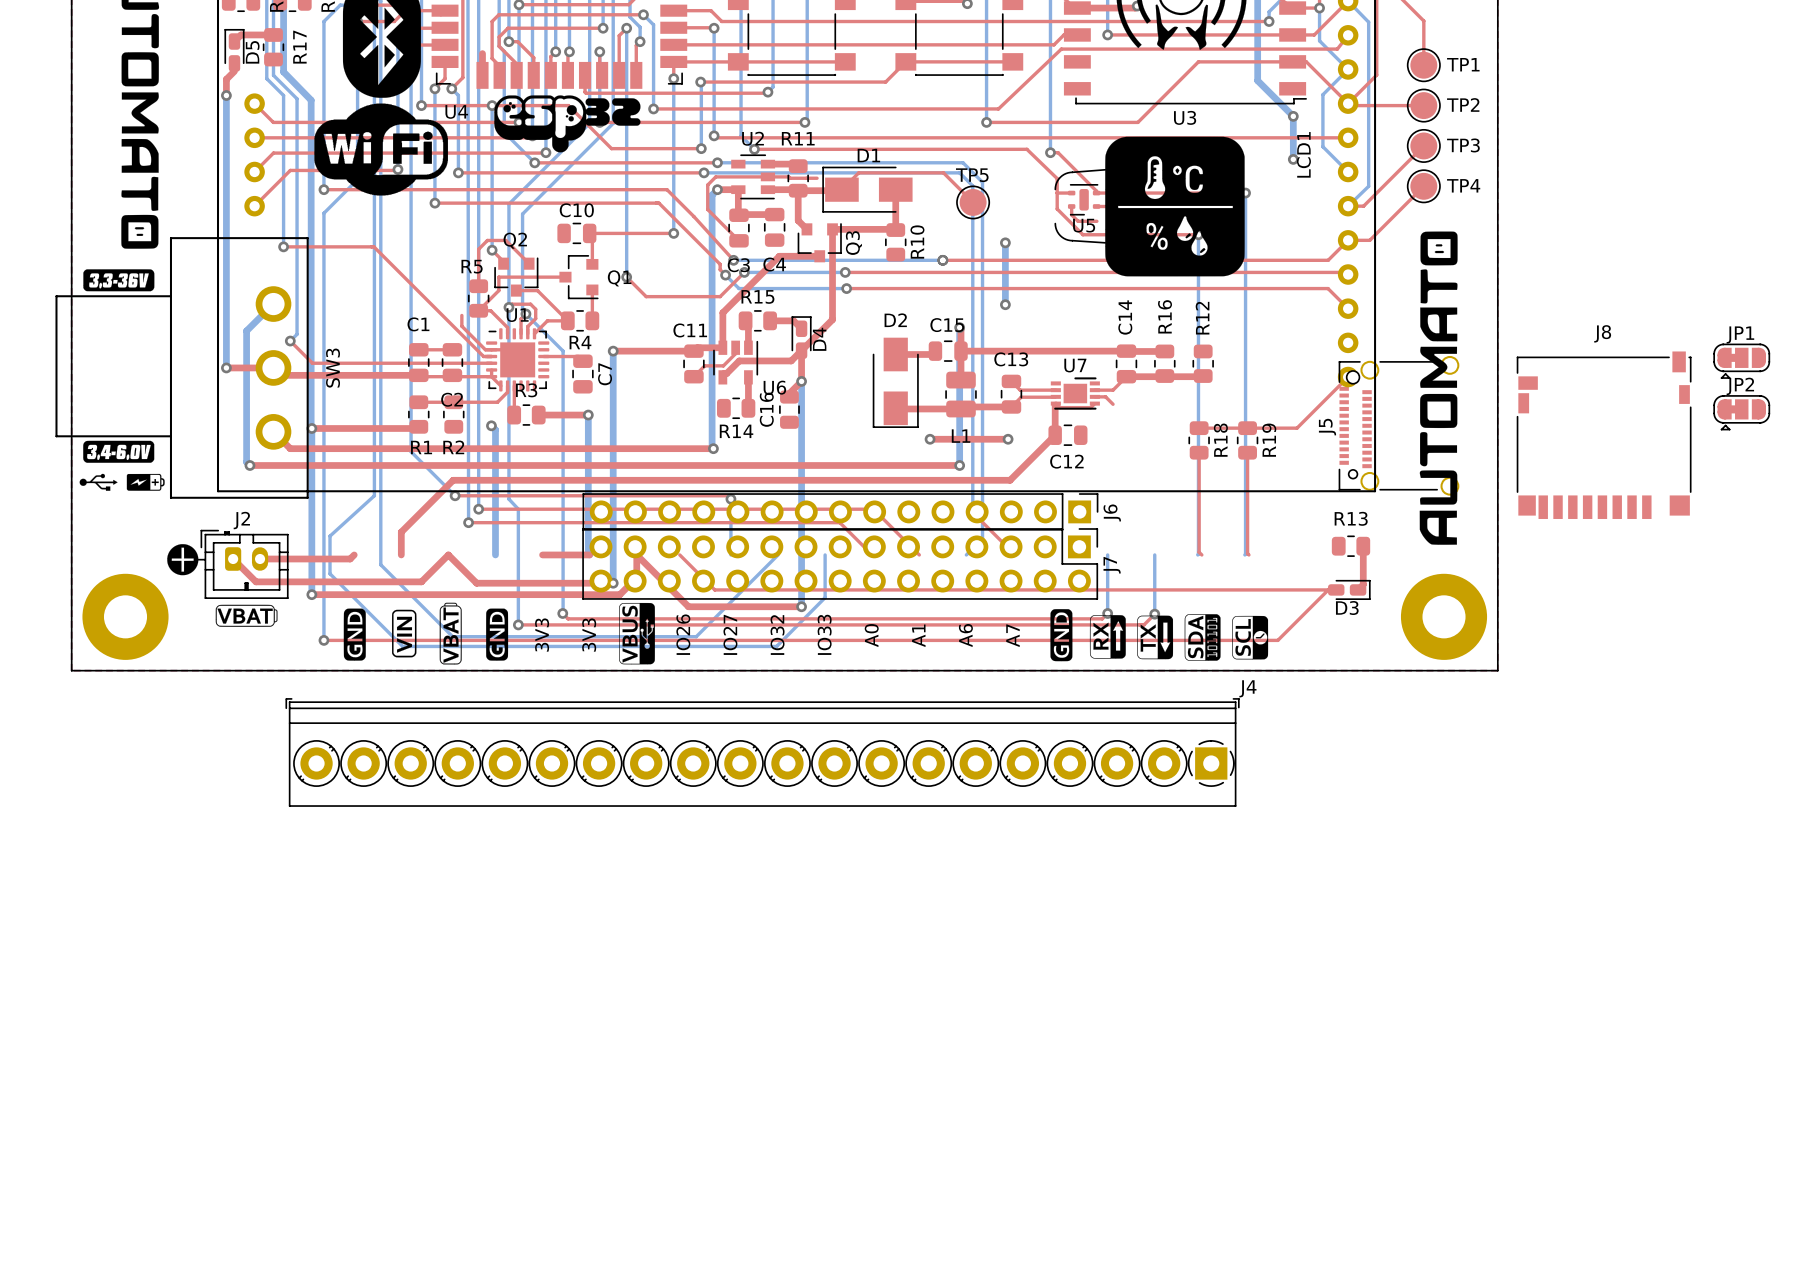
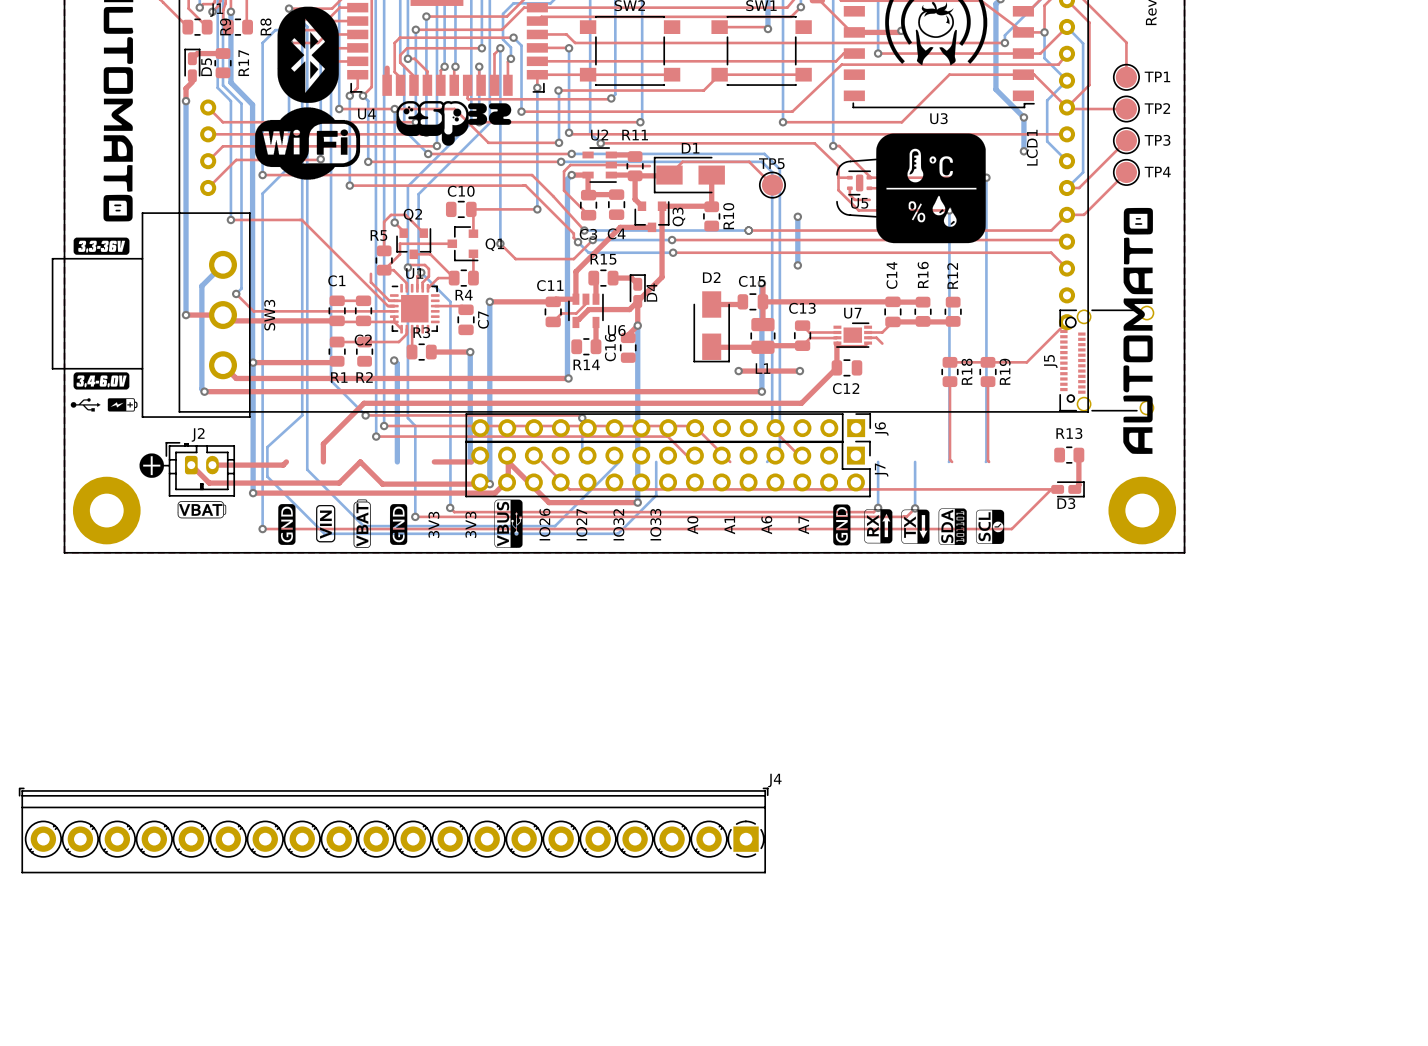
JP1: (1741, 361) -> none
JP2: (1741, 412) -> none
J8: (1604, 435) -> none
J4 position: (762, 752) -> (393, 830)

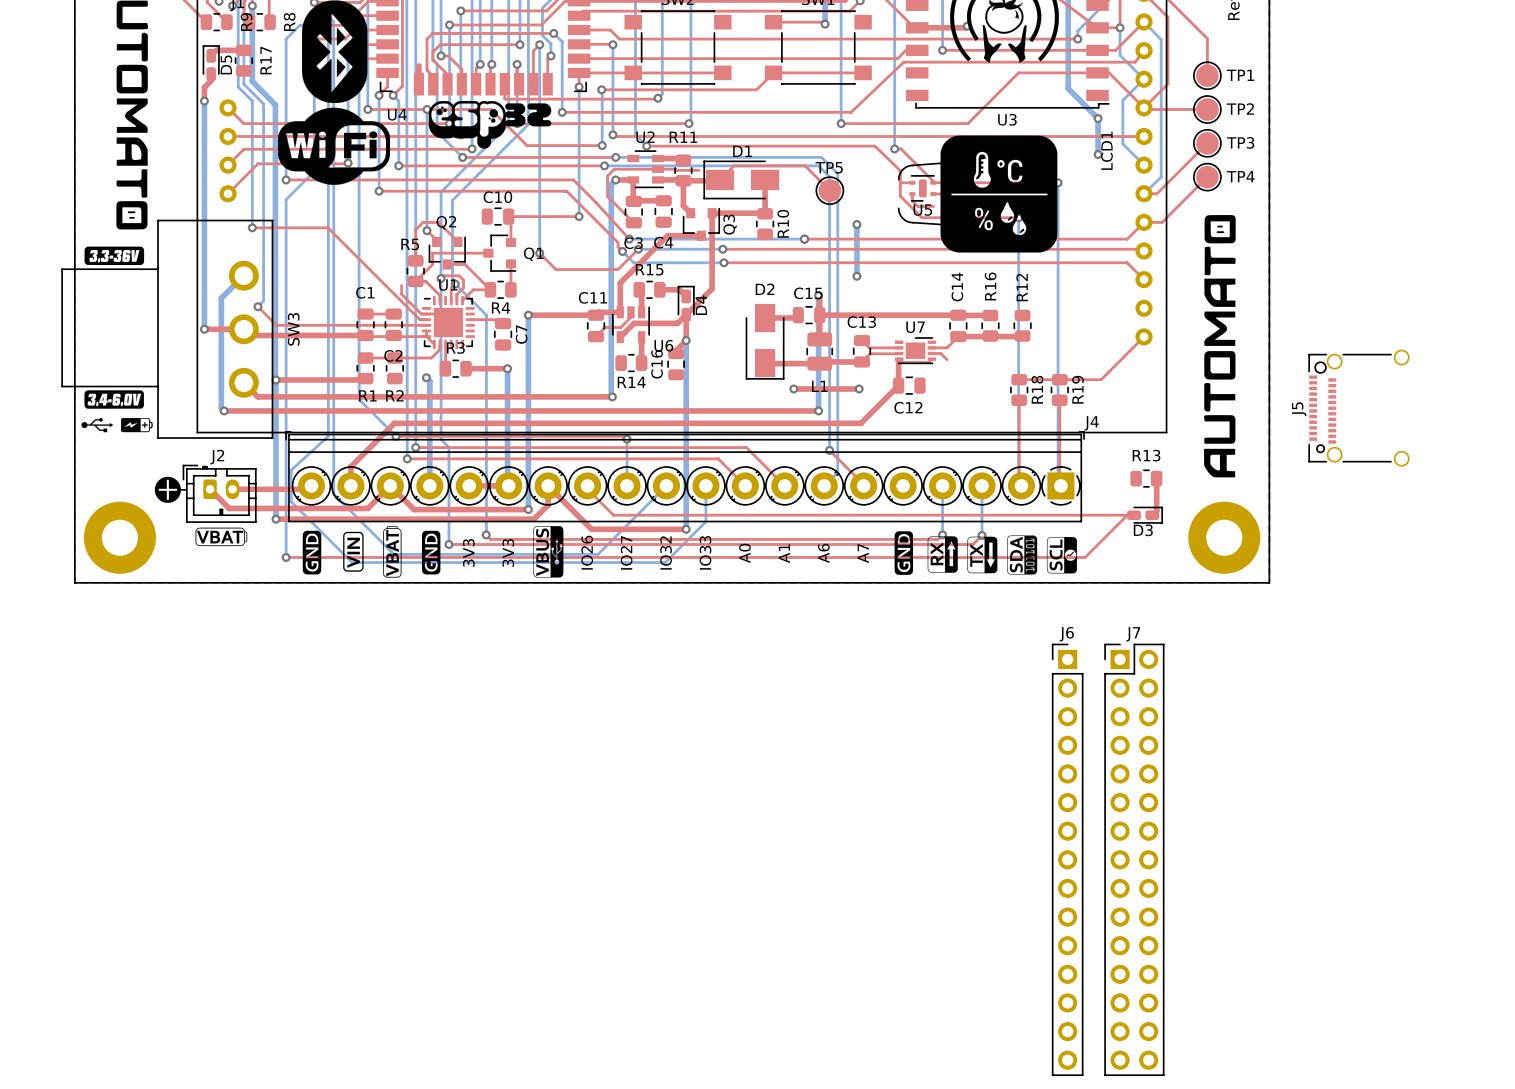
J5 position: (1106, 360) -> (1359, 408)
J6 rotation: 0° (668, 428) -> 90° counterclockwise (1067, 859)
J6 position: (668, 428) -> (1067, 859)
J7 rotation: 0° (668, 469) -> 90° counterclockwise (1134, 859)
J7 position: (668, 469) -> (1134, 859)
J4 position: (393, 830) -> (685, 476)

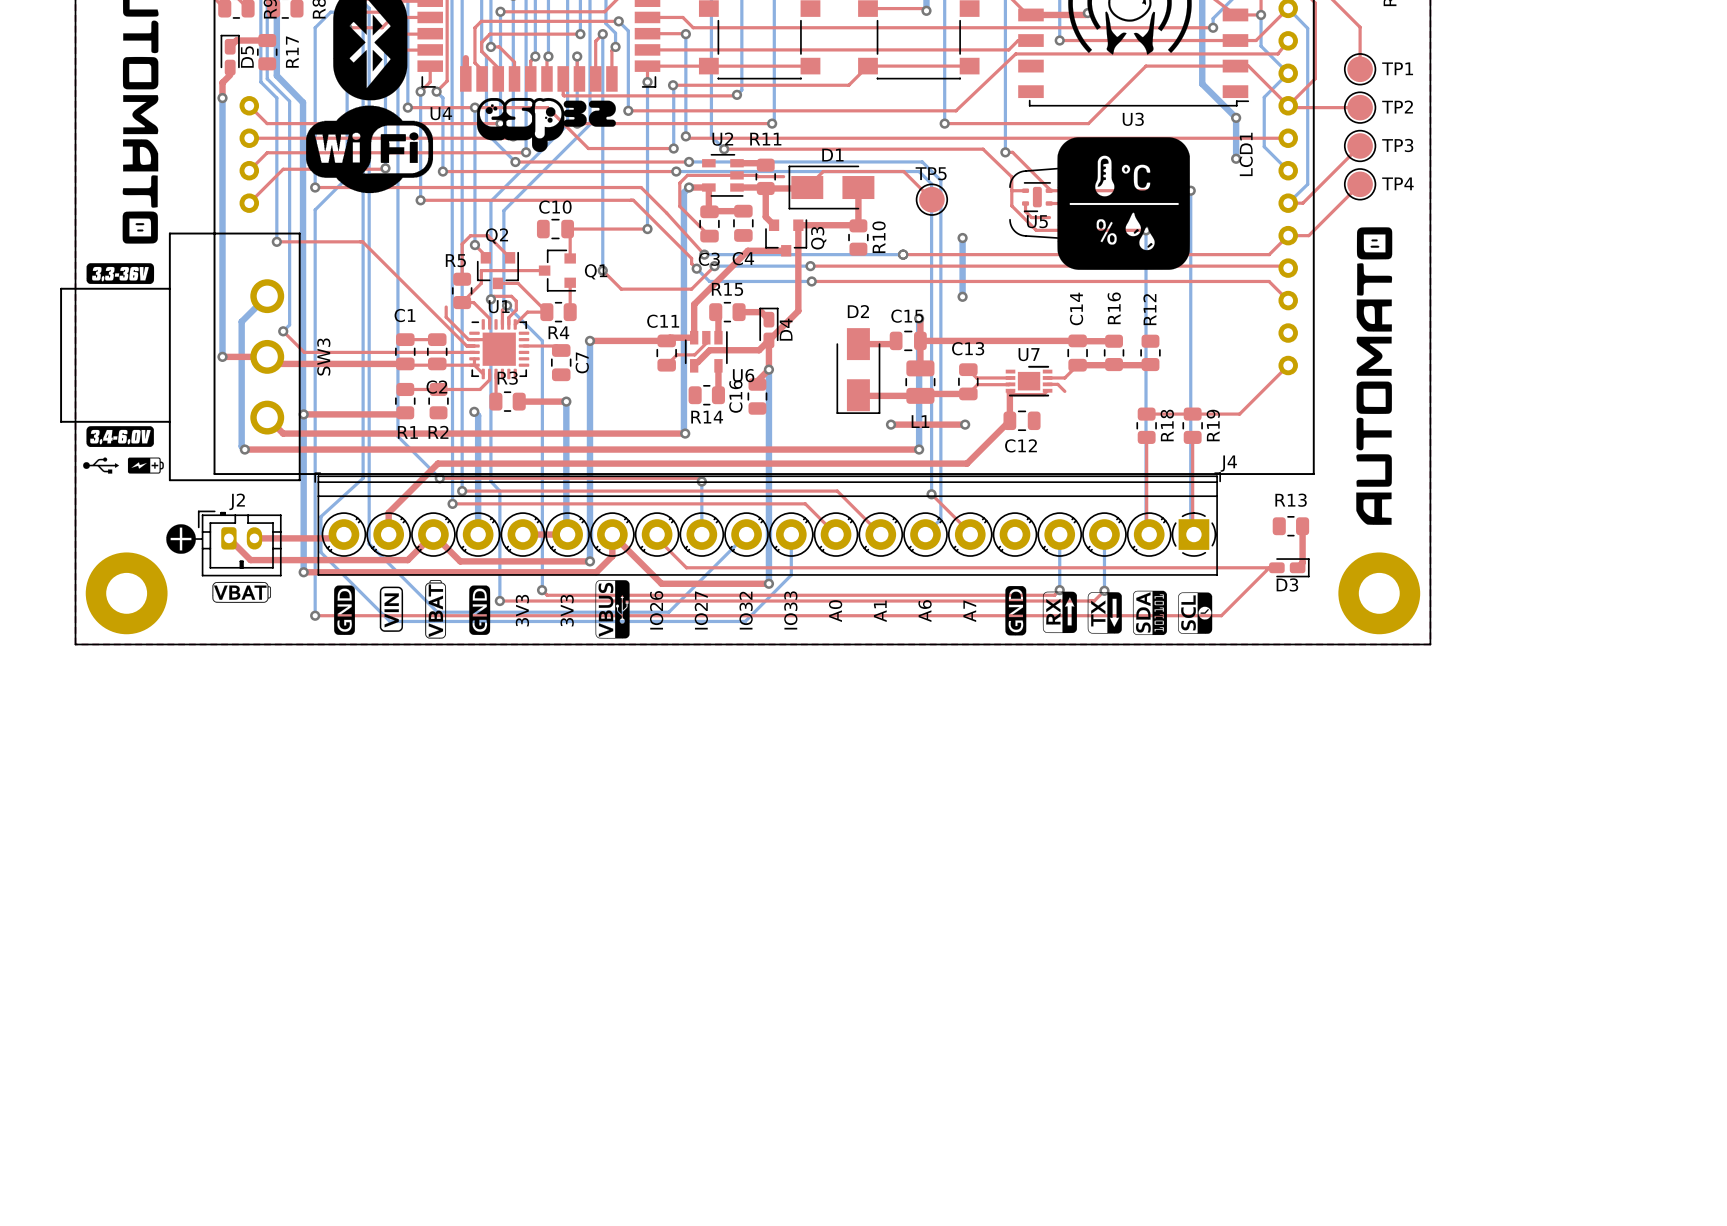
J5: (1359, 408) -> none
J6: (1067, 859) -> none
J7: (1134, 859) -> none

